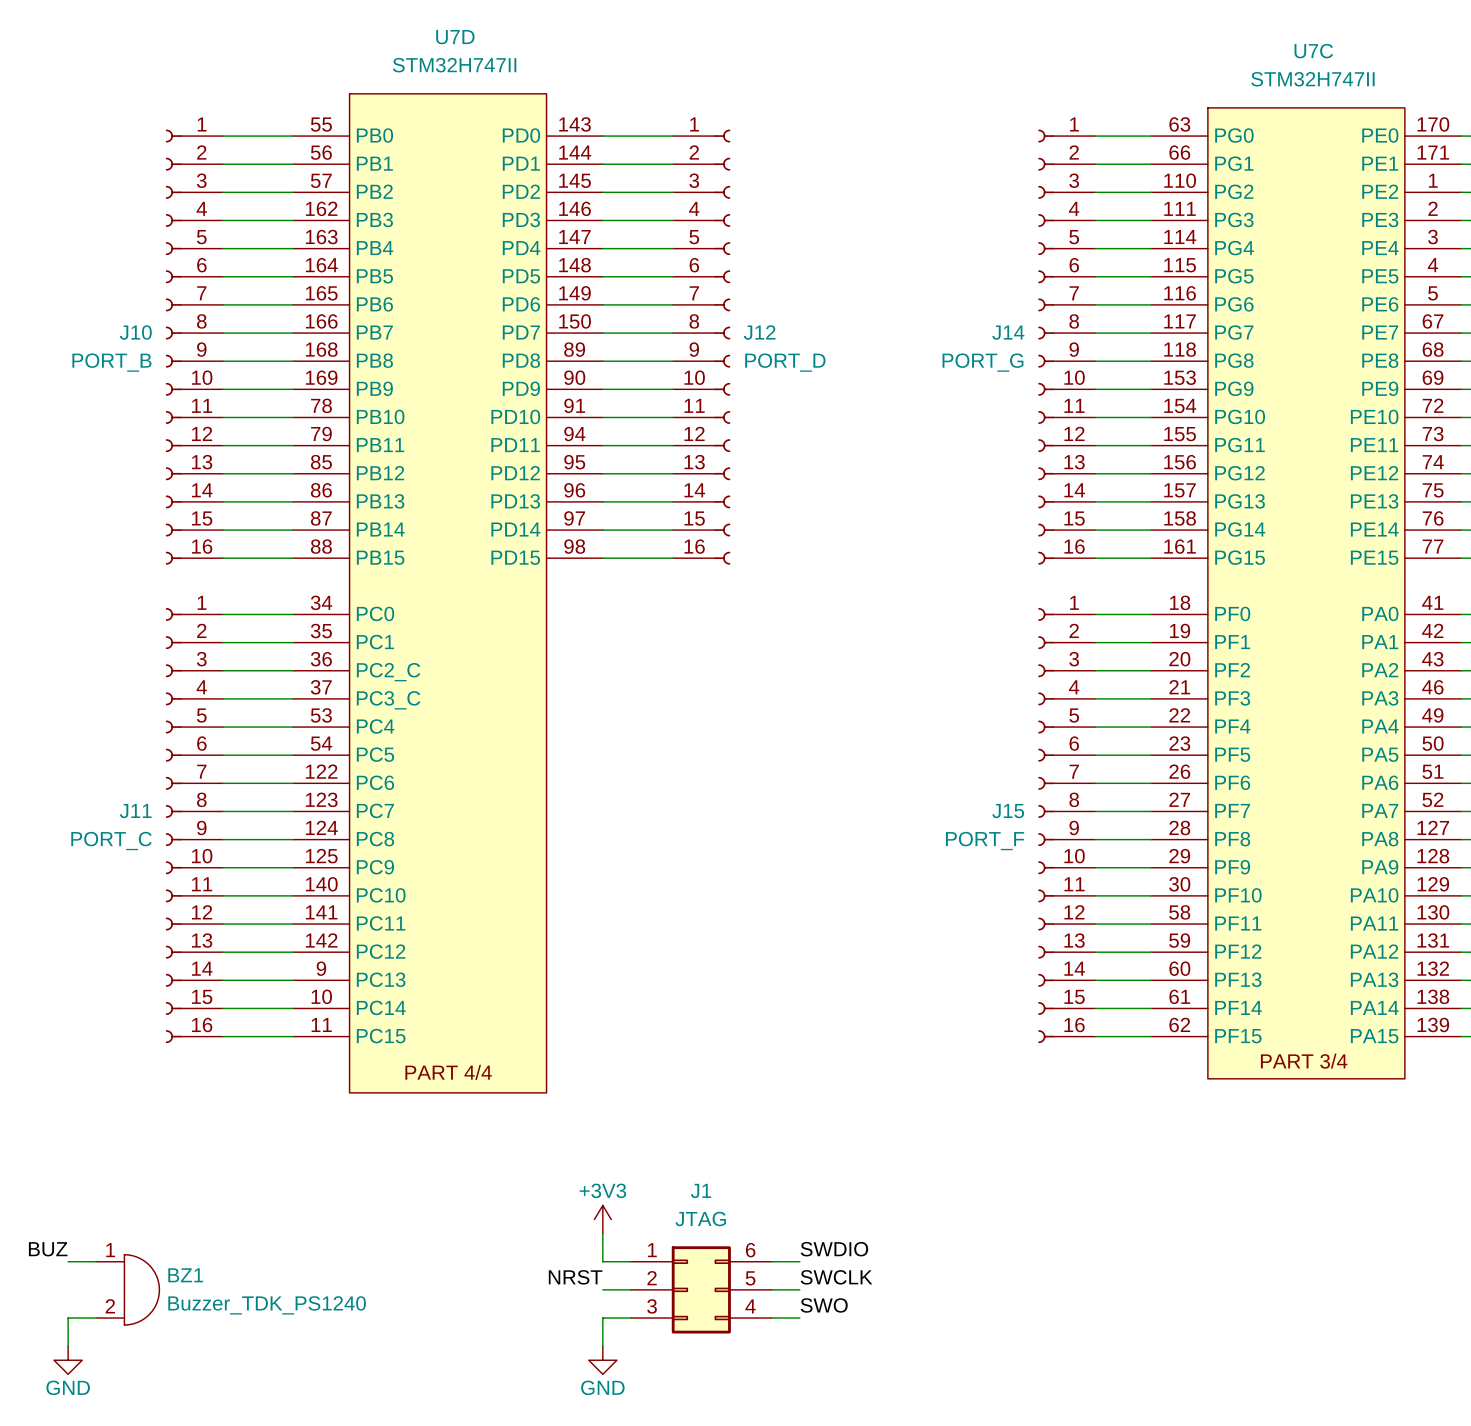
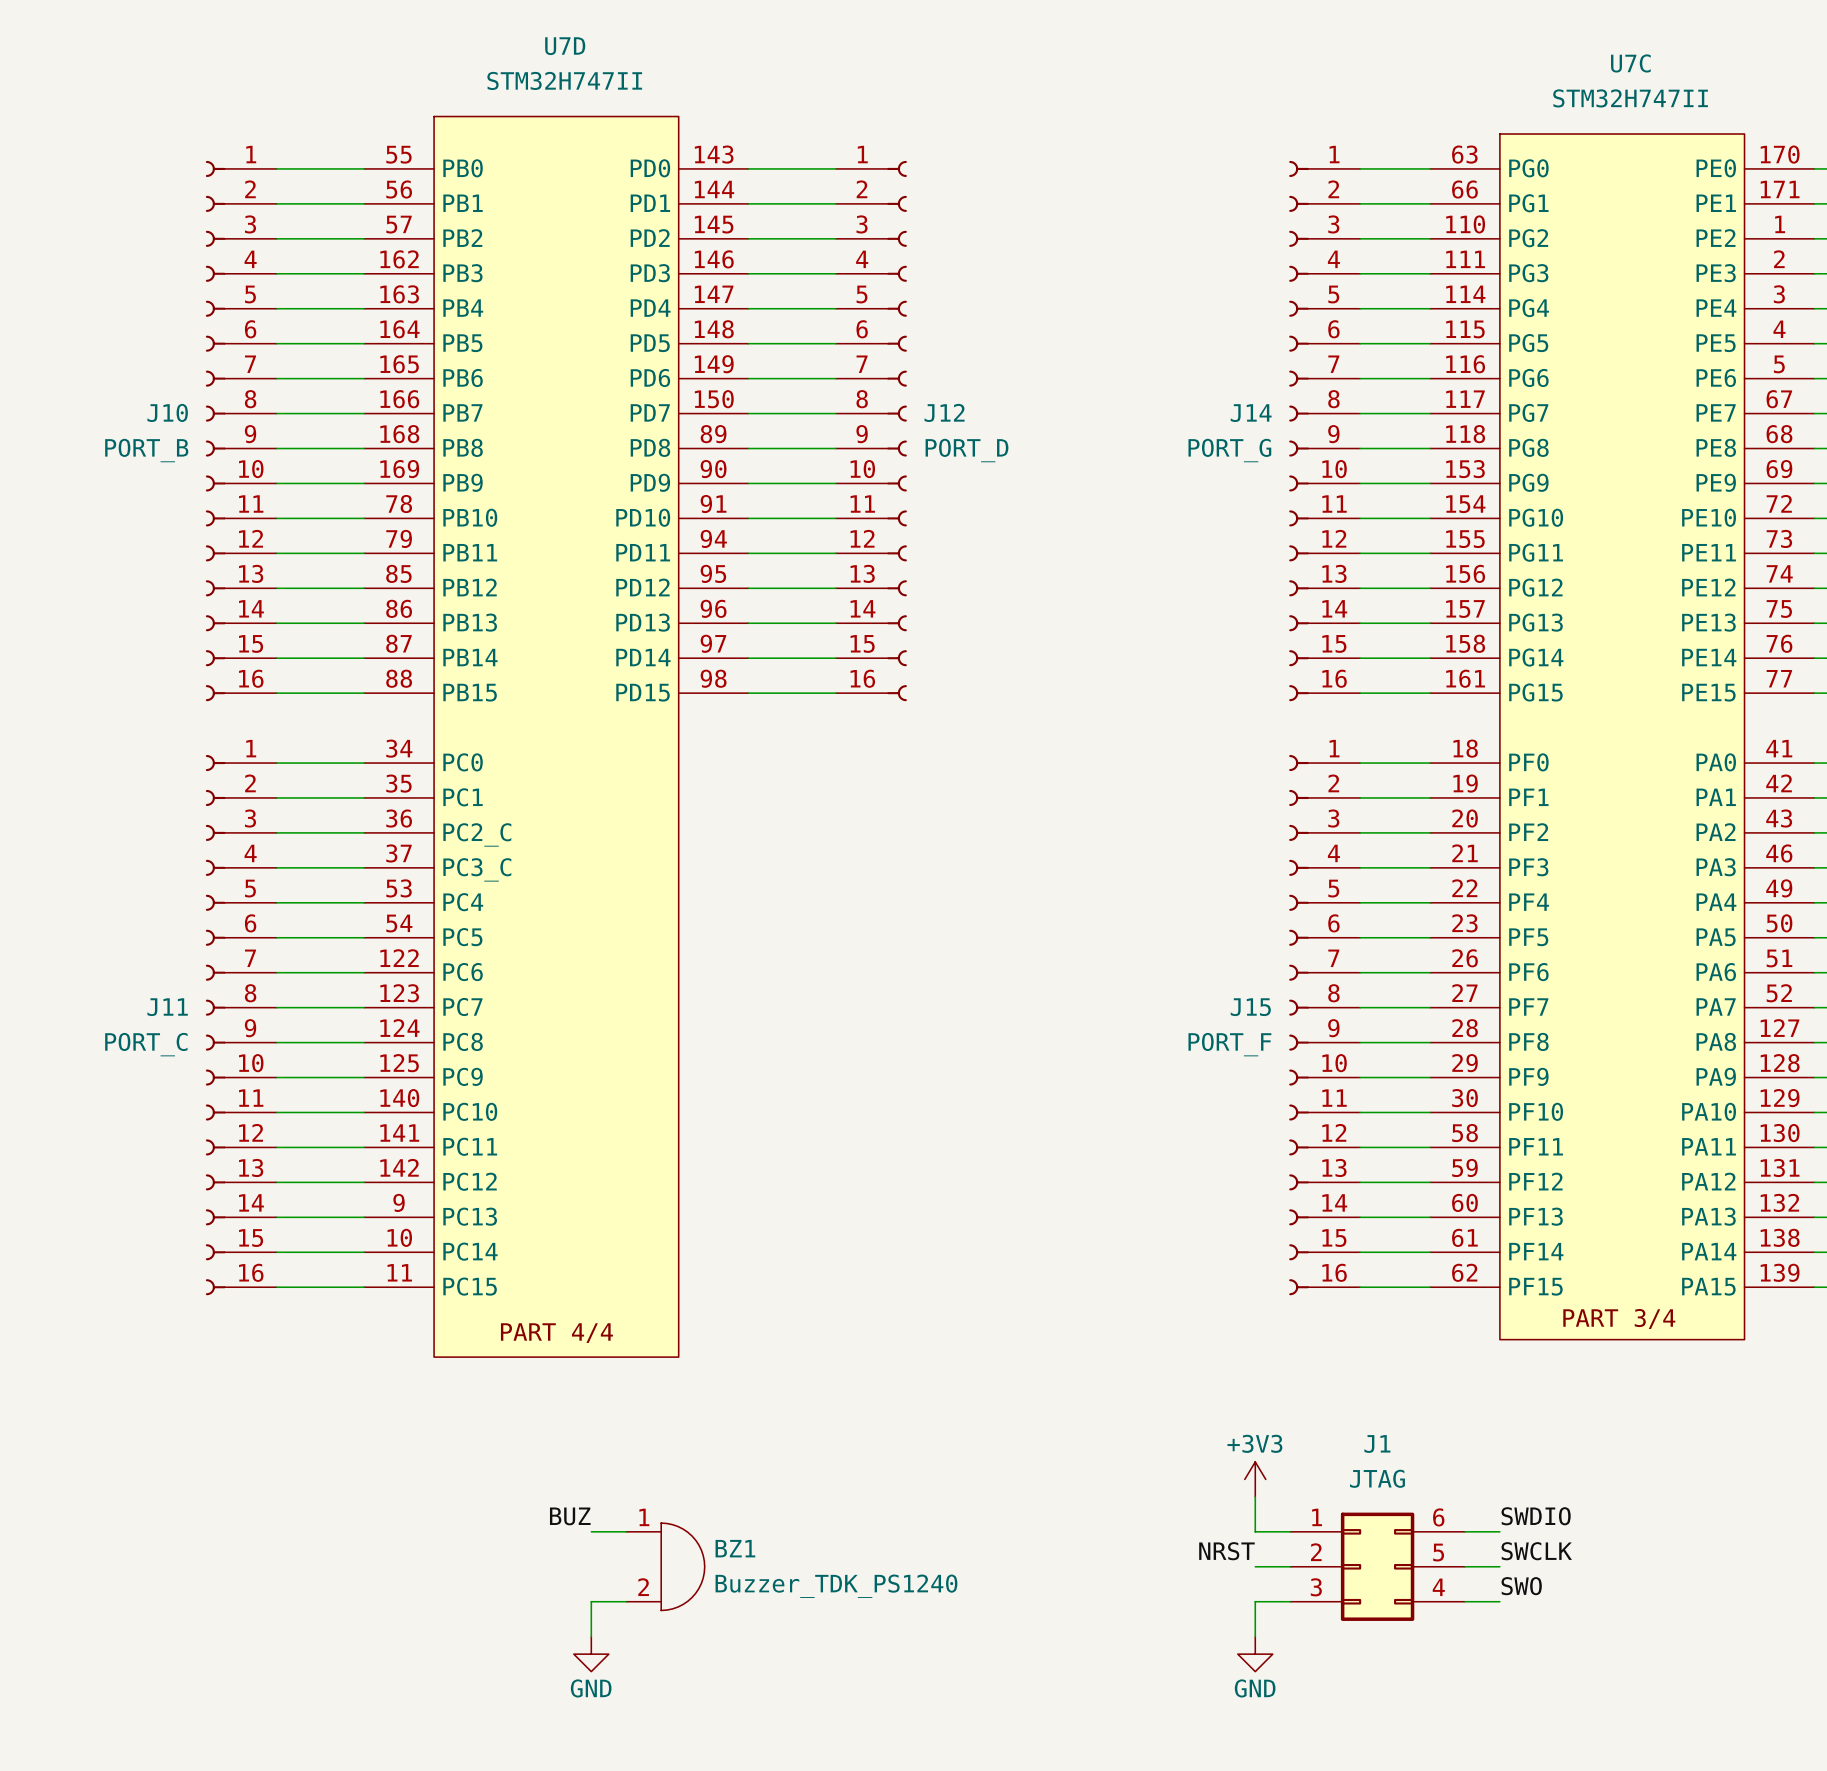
power symbol: none -> +3V3 (1255, 1479)
wire: none -> (1255, 1496) (1255, 1531) (1290, 1531)
power symbol: +3V3 (602, 1219) -> none
label: none -> BUZ (570, 1516)
label: none -> SWDIO (1536, 1516)
wire: (602, 1233) (602, 1261) (630, 1261) -> none
wire: none -> (1464, 1531) (1499, 1531)
label: BUZ (48, 1249) -> none
label: SWDIO (834, 1249) -> none
label: none -> NRST (1226, 1551)
label: none -> SWCLK (1536, 1551)
wire: (68, 1261) (96, 1261) -> none
wire: (771, 1261) (799, 1261) -> (1255, 1566) (1290, 1566)
wire: none -> (1464, 1566) (1499, 1566)
label: NRST (575, 1277) -> none
label: SWCLK (836, 1277) -> none
label: none -> SWO (1521, 1586)
BZ1 position: (127, 1289) -> (665, 1566)
wire: (602, 1289) (630, 1289) -> (591, 1531) (626, 1531)
J1 position: (701, 1289) -> (1377, 1566)
wire: (771, 1289) (799, 1289) -> none
wire: none -> (1290, 1601) (1255, 1601) (1255, 1636)
wire: none -> (1464, 1601) (1499, 1601)
label: SWO (824, 1305) -> none
wire: (96, 1318) (68, 1318) (68, 1346) -> none
wire: (630, 1318) (602, 1318) (602, 1346) -> (626, 1601) (591, 1601) (591, 1636)
wire: (771, 1318) (799, 1318) -> none
power symbol: none -> GND (1255, 1654)
power symbol: GND (68, 1360) -> none
power symbol position: GND (602, 1360) -> GND (591, 1654)

